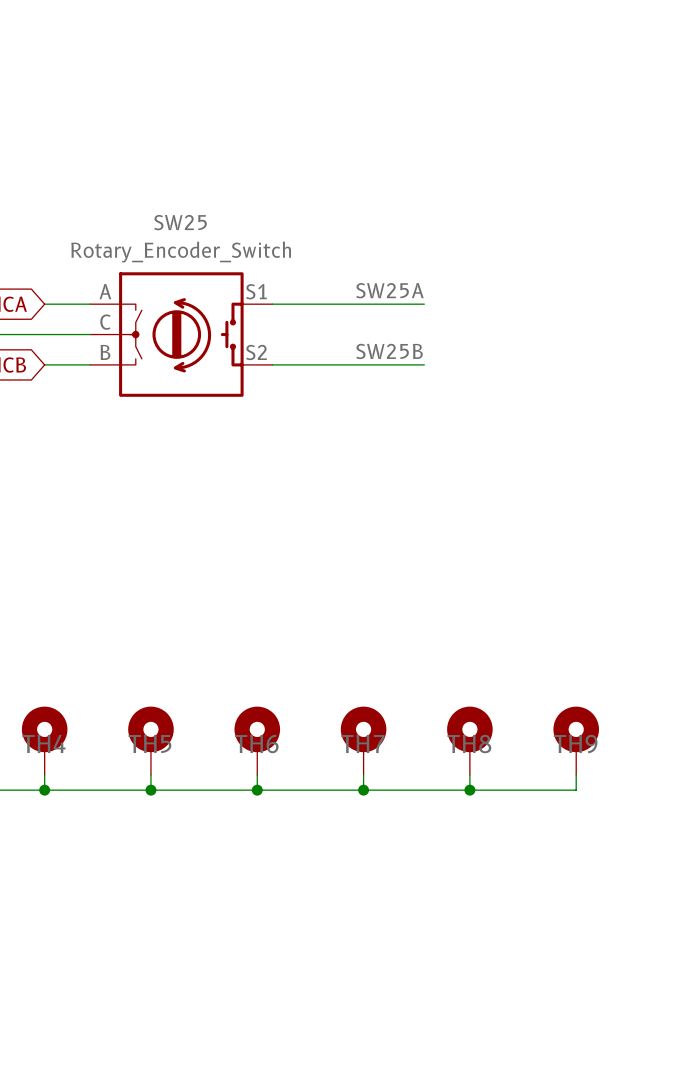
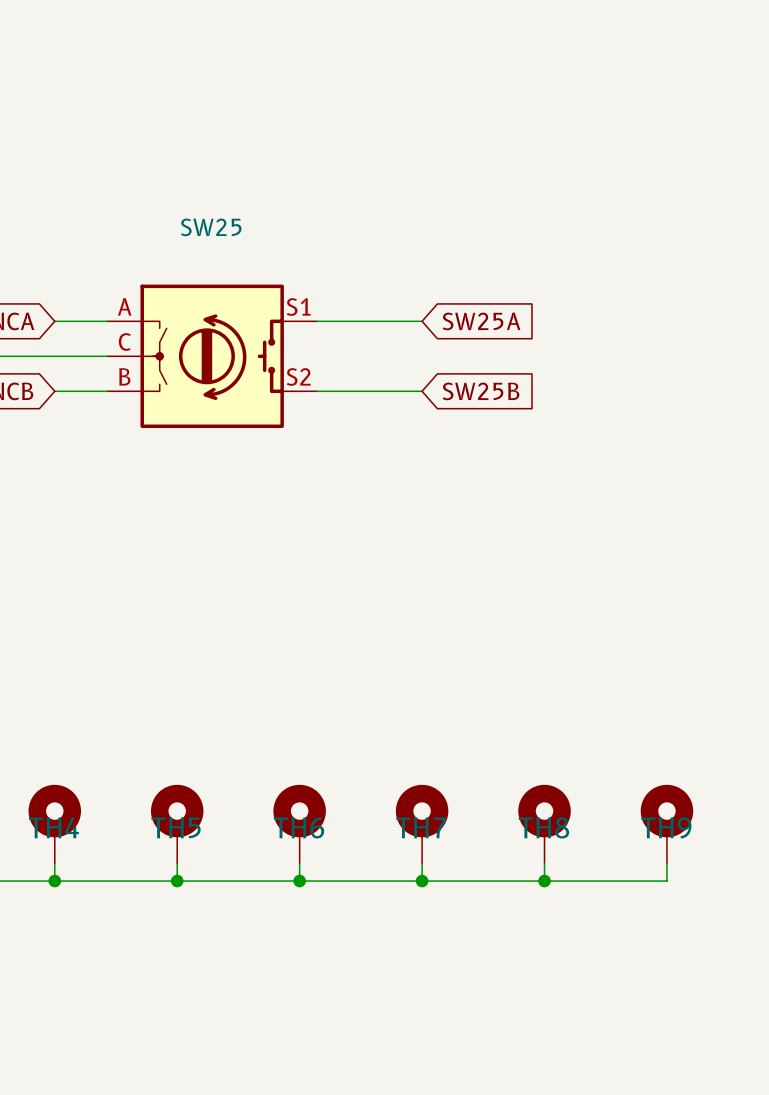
SW25 value: Rotary_Encoder_Switch (181, 252) -> none
label: SW25A (389, 290) -> none
wire: (363, 304) (424, 304) -> none
global label: none -> SW25A (481, 321)
label: SW25B (389, 351) -> none
wire: (363, 364) (424, 364) -> none
global label: none -> SW25B (481, 391)

